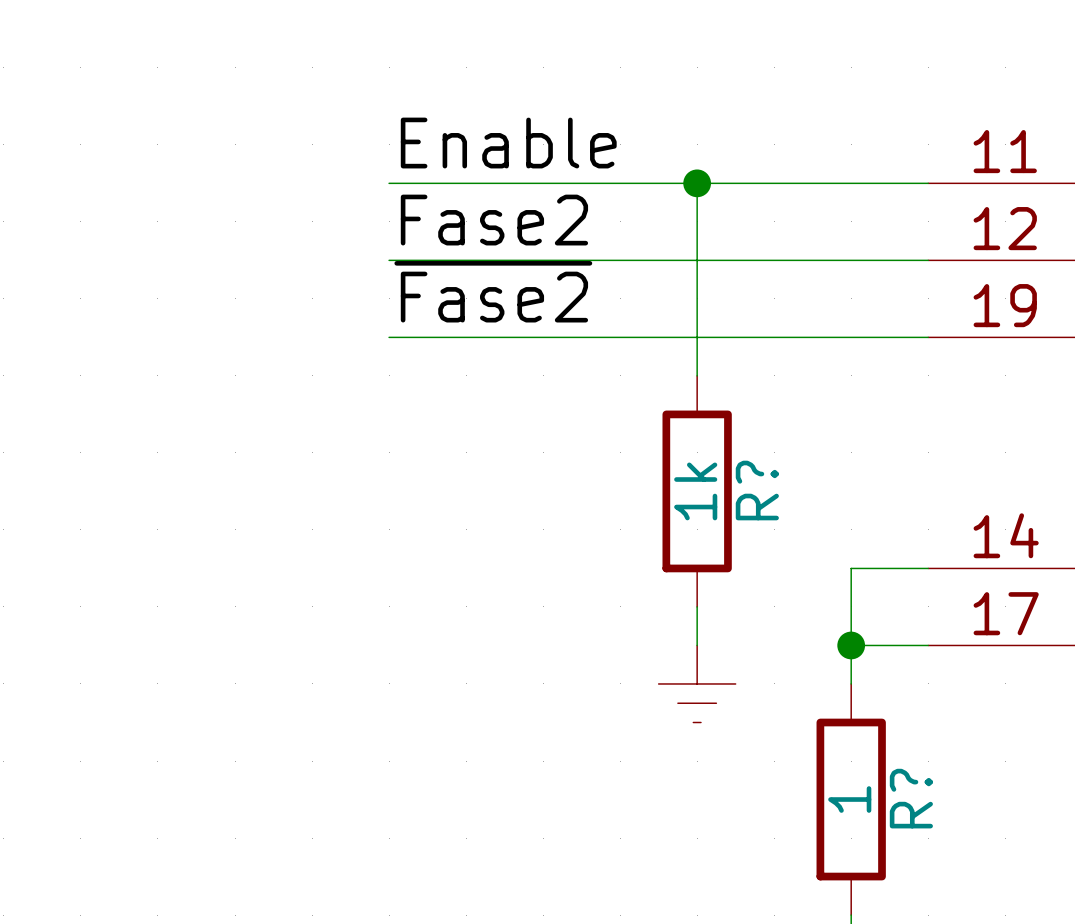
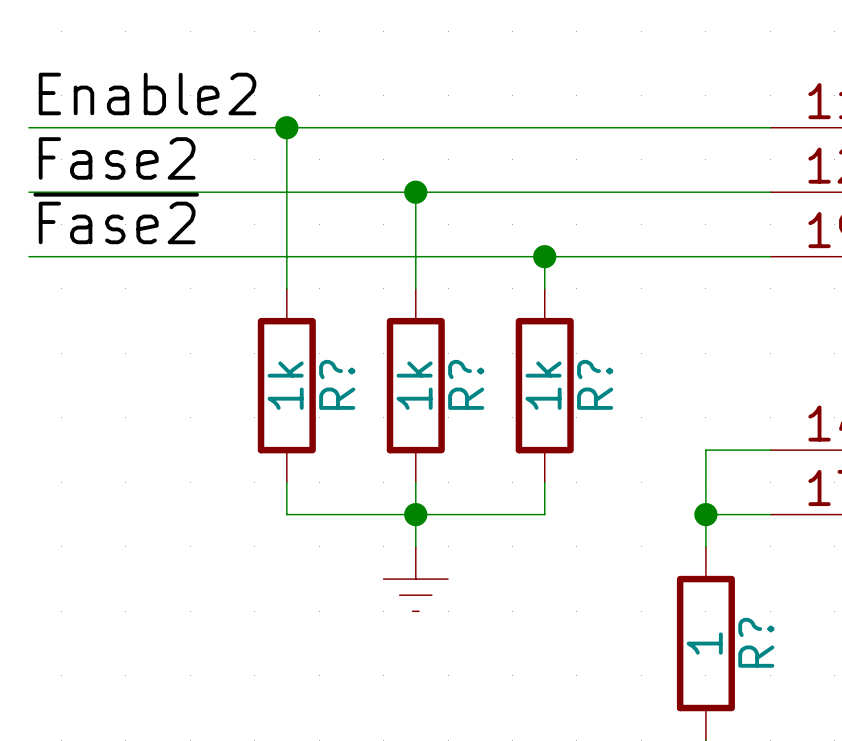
label: none -> Enable2 (147, 93)
label: Enable (508, 143) -> none
wire: none -> (28, 127) (319, 127)
junction: none -> (286, 127)
wire: (697, 183) (697, 375) -> (286, 127) (286, 288)
junction: (697, 183) -> none
label position: Fase2 (494, 220) -> Fase2 (117, 158)
wire: none -> (28, 192) (319, 192)
wire: none -> (415, 192) (415, 288)
junction: none -> (415, 192)
label position: ~{Fase2} (493, 291) -> ~{Fase2} (116, 218)
wire: none -> (28, 256) (319, 256)
junction: none -> (544, 256)
R?: none -> 1k (286, 385)
R?: none -> 1k (415, 385)
R? position: (697, 491) -> (544, 385)
wire: none -> (286, 482) (286, 514) (544, 514) (544, 482)
wire: none -> (415, 482) (415, 546)
wire: (697, 606) (697, 645) -> (544, 256) (544, 288)
junction: none -> (415, 514)
power symbol position: (697, 683) -> (415, 579)

